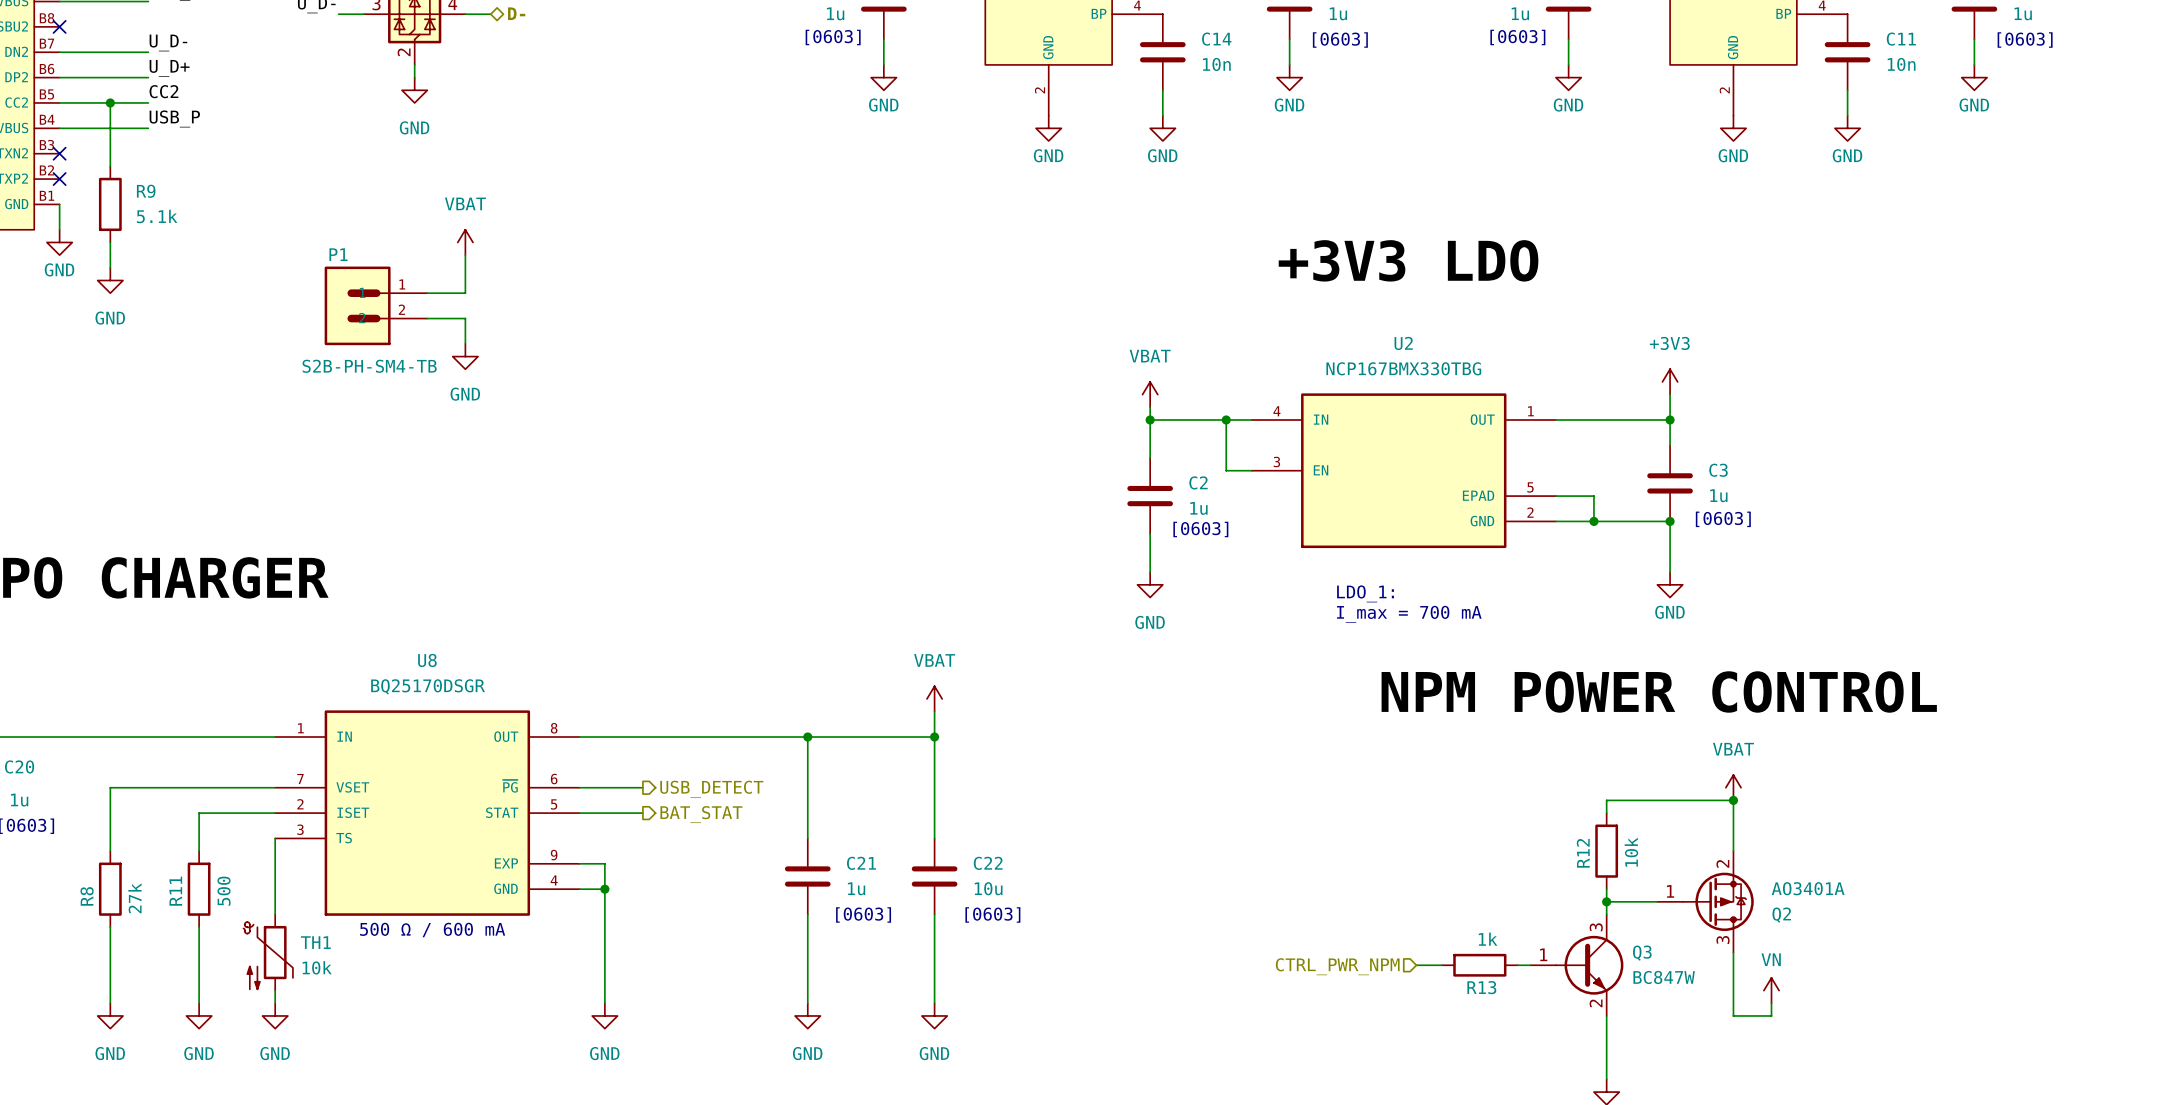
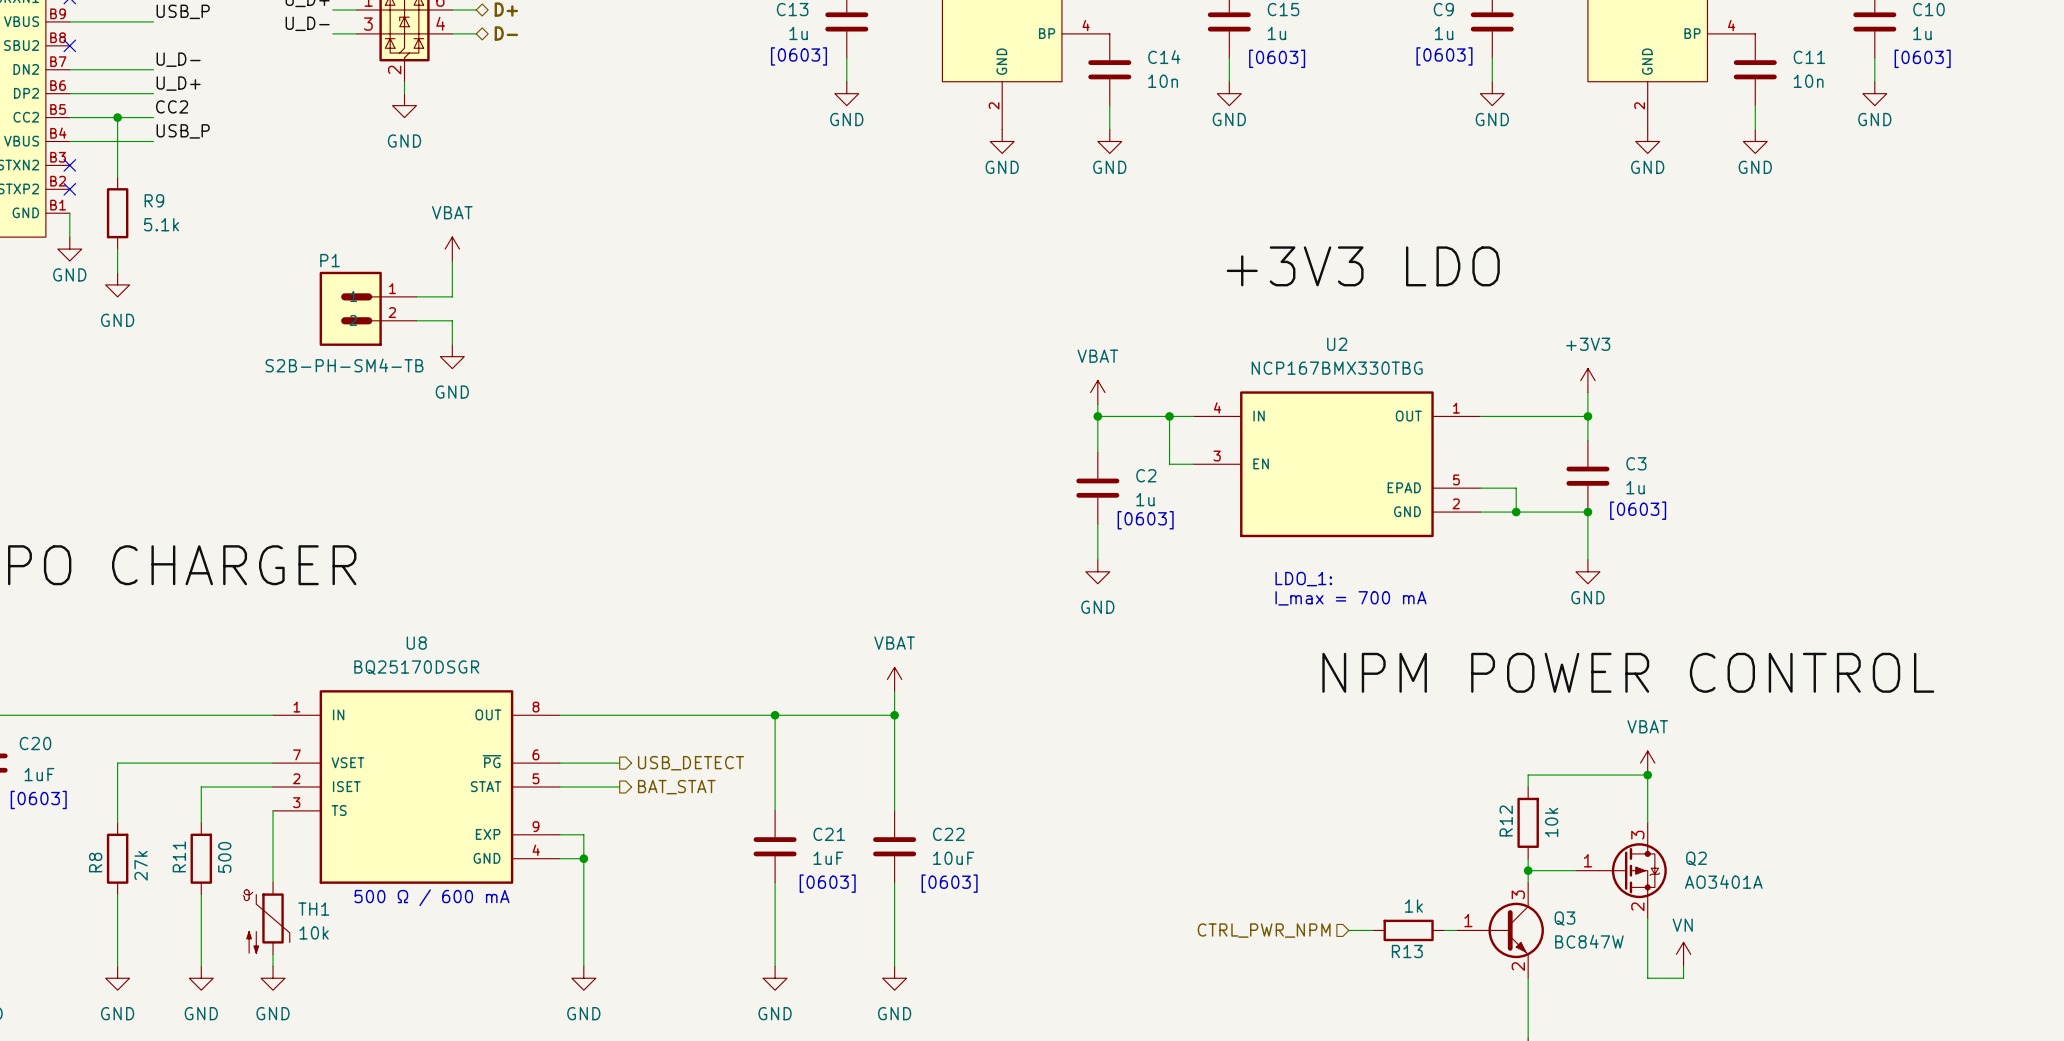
C20 value: 1u (19, 800) -> 1uF (39, 774)
C21 value: 1u (856, 888) -> 1uF (828, 858)
C22 value: 10u (988, 888) -> 10uF (953, 858)
Q2 flip: as is (1718, 901) -> up-down (1633, 870)

